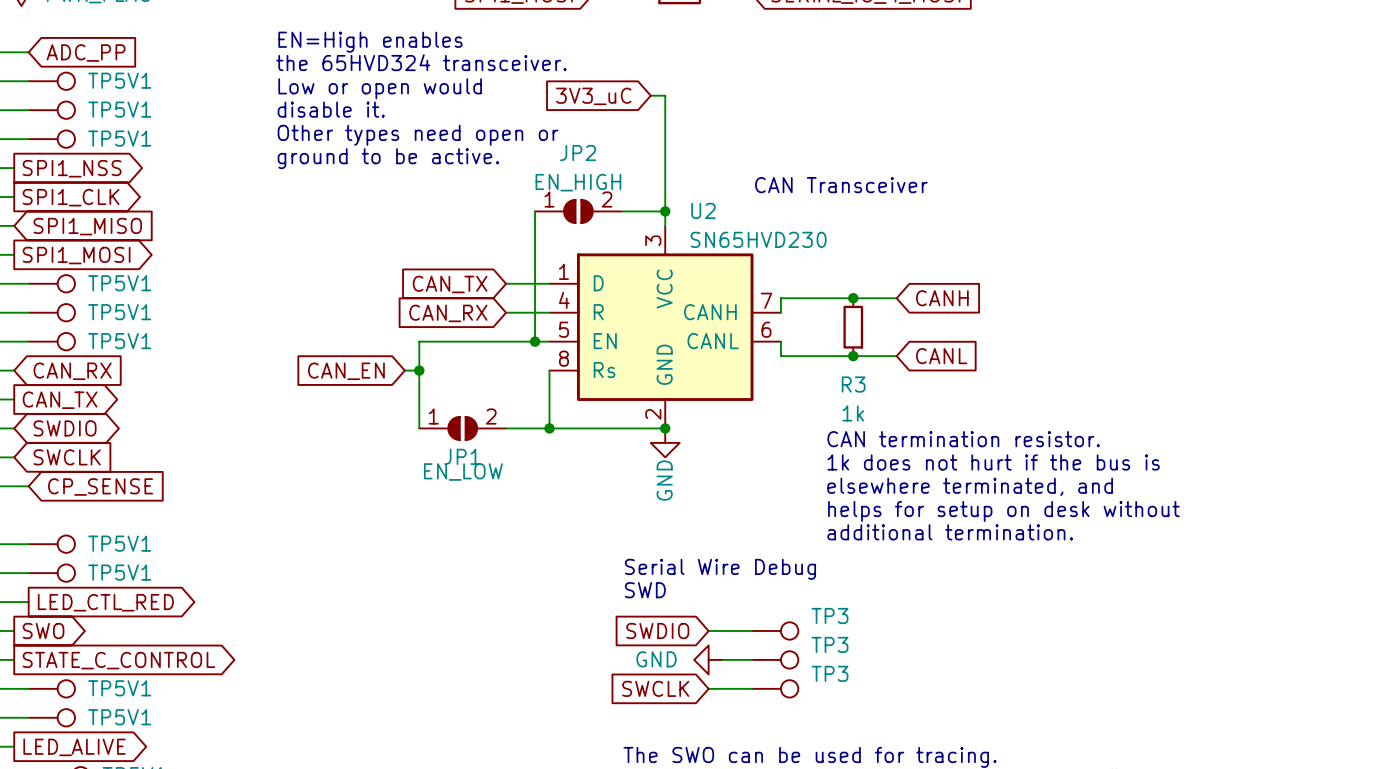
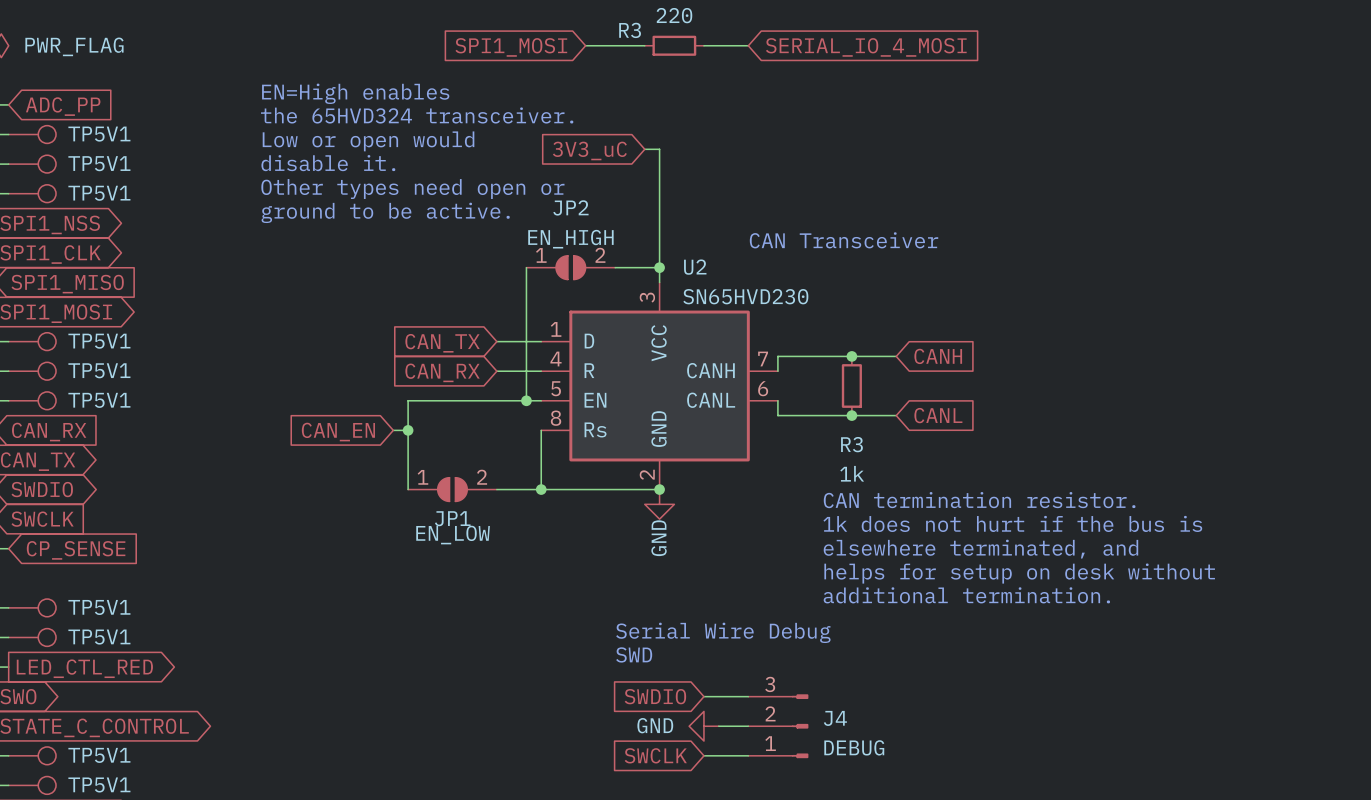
TP3: (775, 630) -> none
TP3: (775, 659) -> none
J4: none -> DEBUG (778, 726)
TP3: (775, 688) -> none

